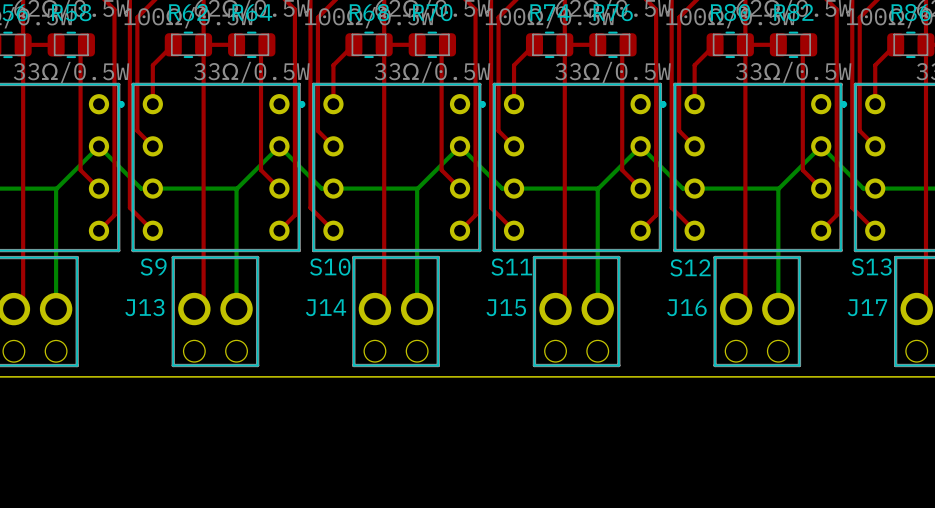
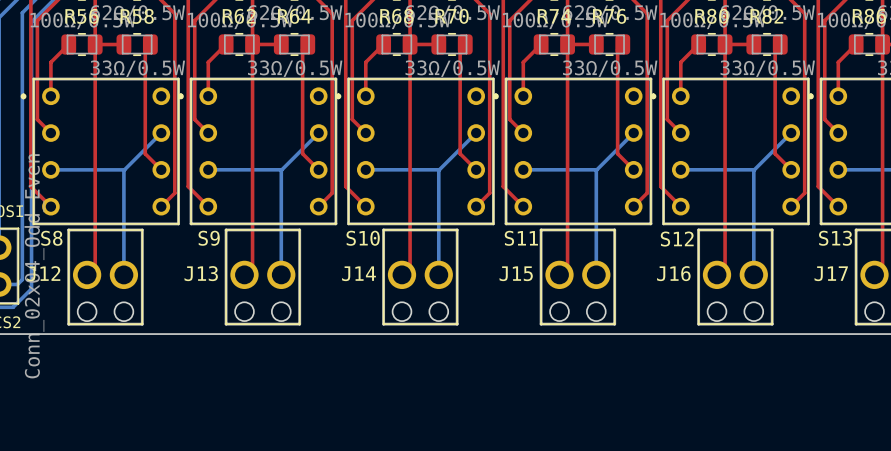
bottom track: (98, 146) (141, 188) (152, 188) -> none
bottom track: (279, 146) (321, 188) (333, 188) -> none
bottom track: (460, 146) (502, 188) (514, 188) -> none
bottom track: (640, 146) (682, 188) (694, 188) -> none
bottom track: (821, 146) (863, 188) (875, 188) -> none

